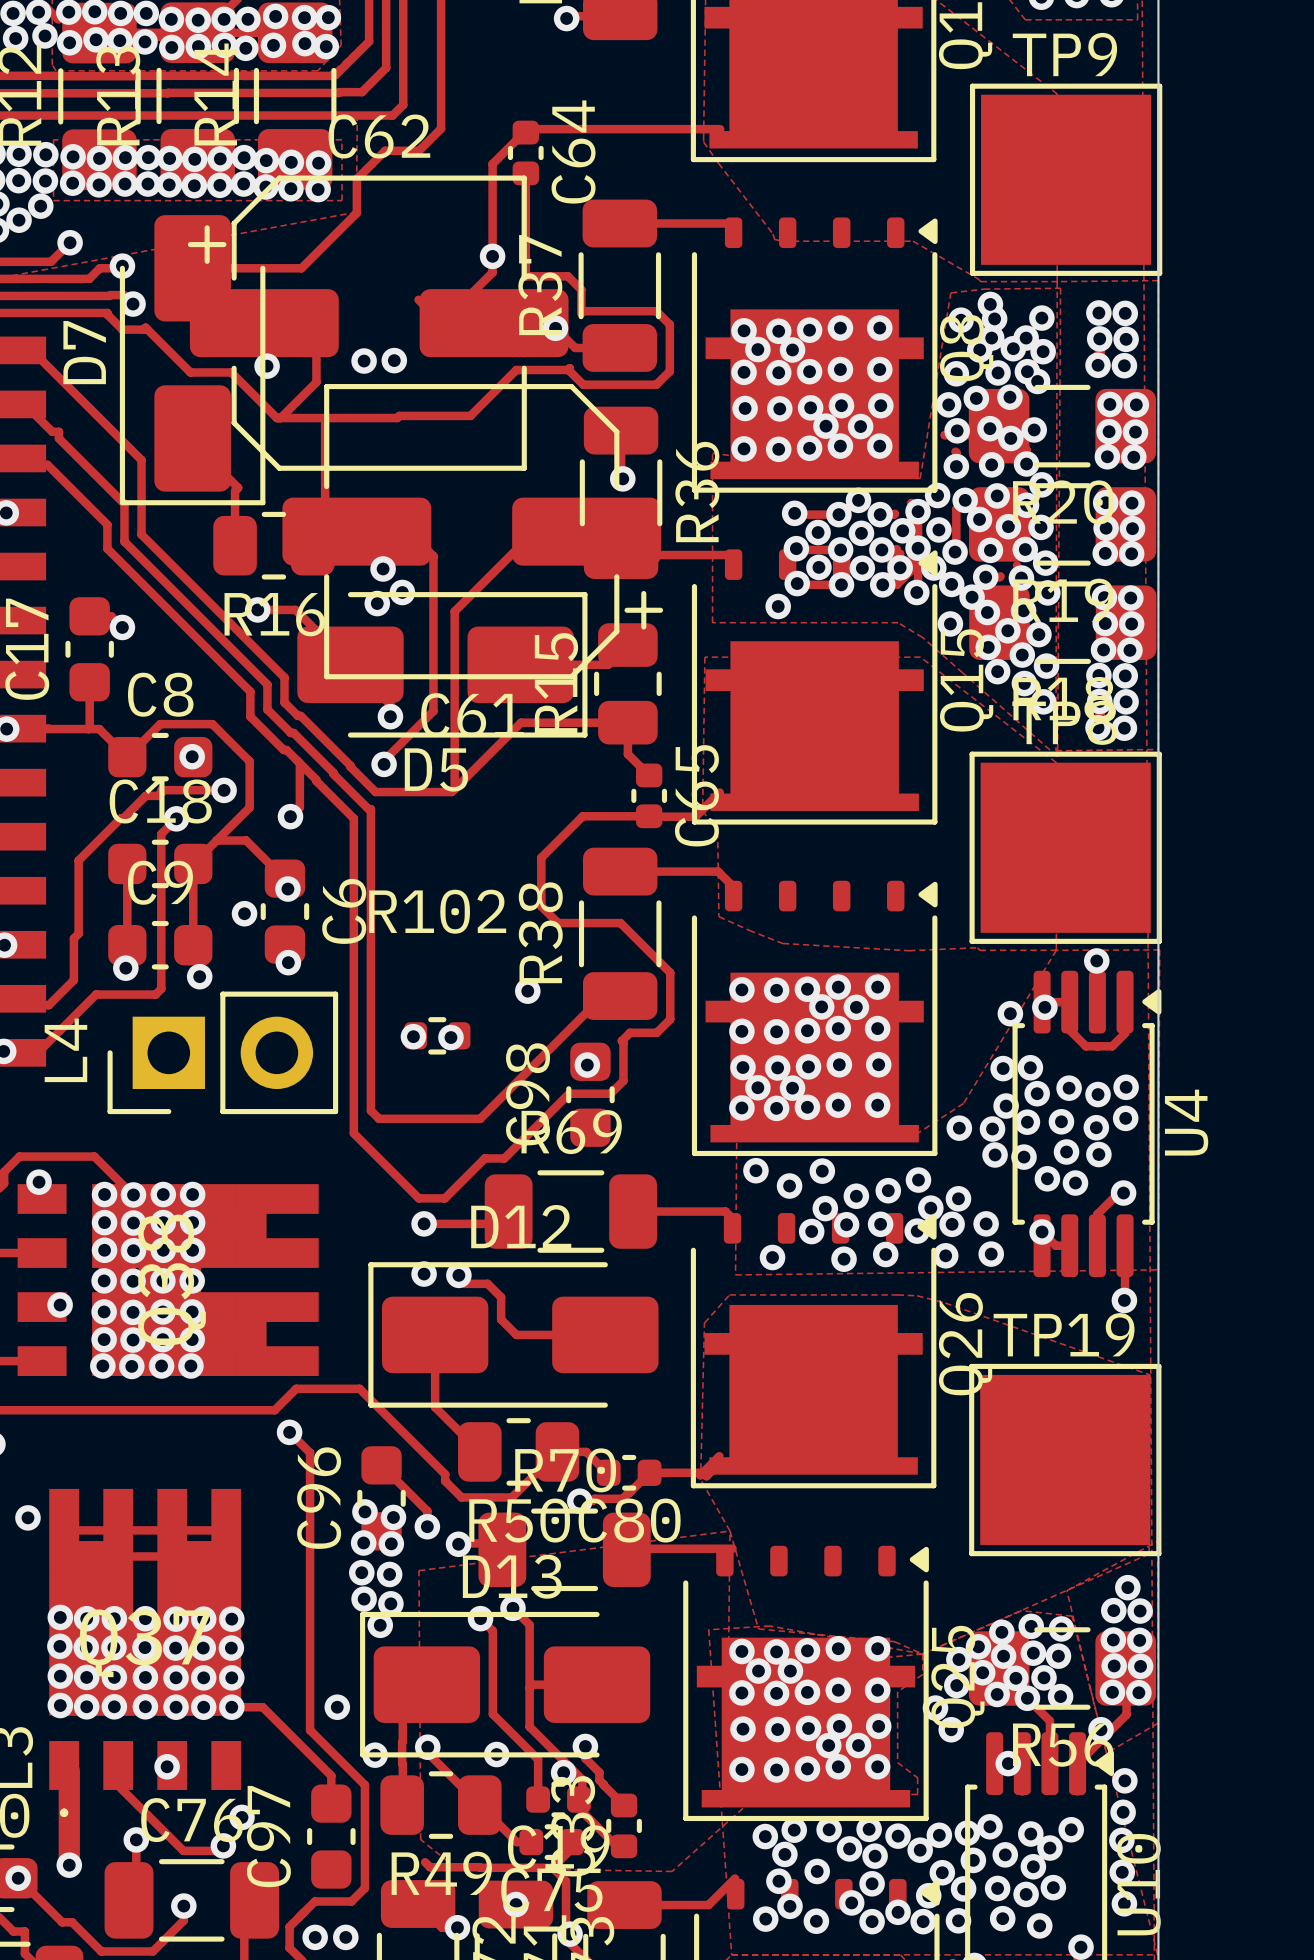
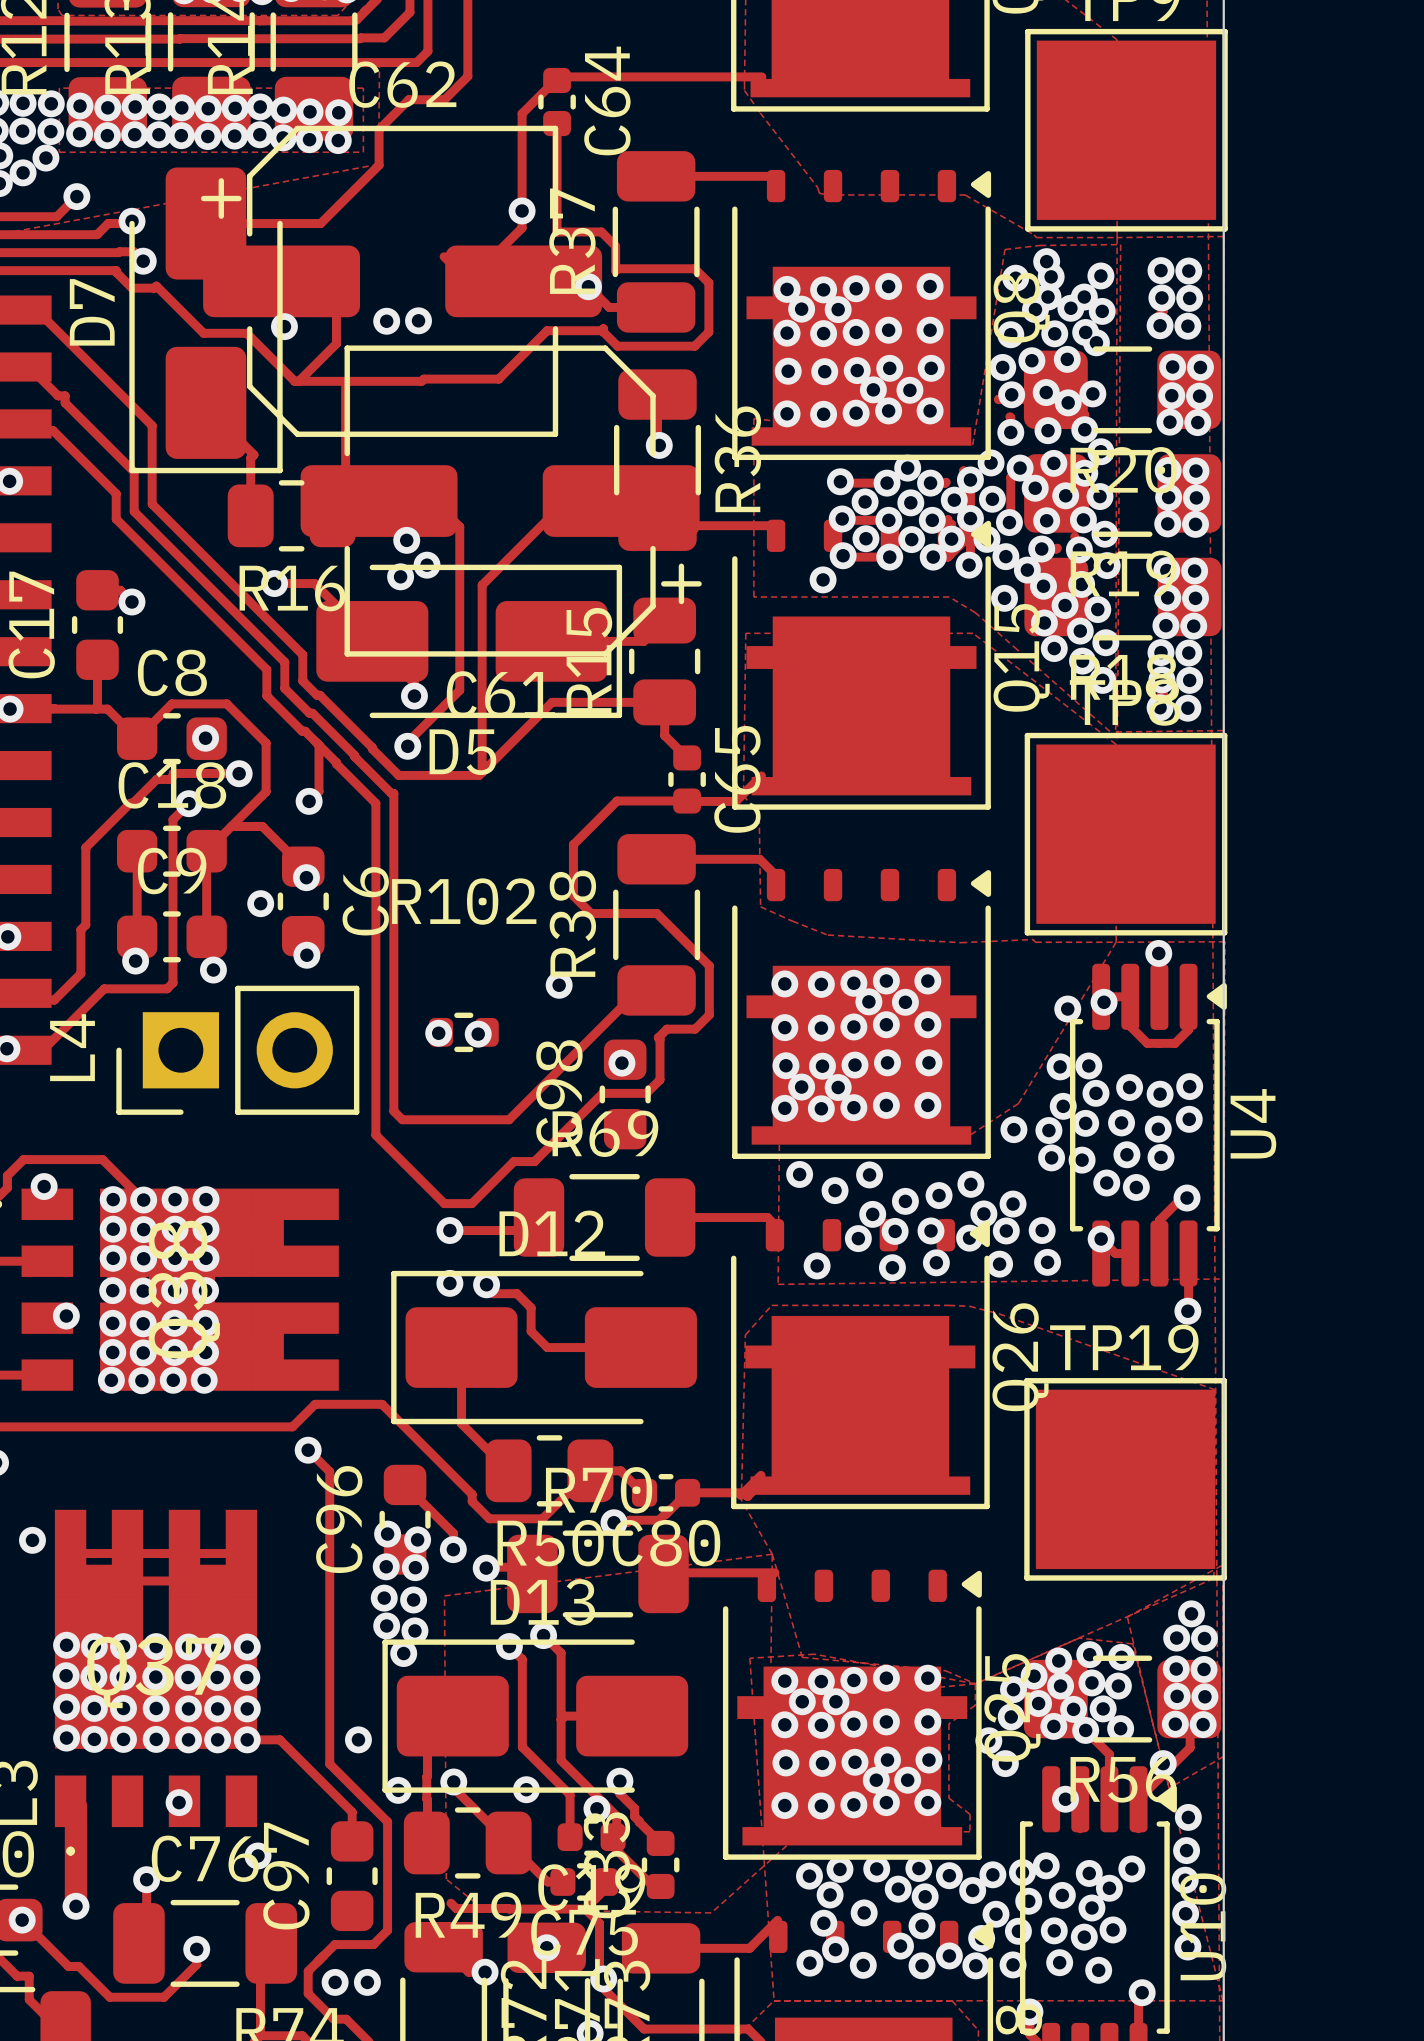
track: (118, 1765) (118, 1785) (183, 1850) (218, 1850) (223, 1845) -> none
via: (223, 1845) -> none

